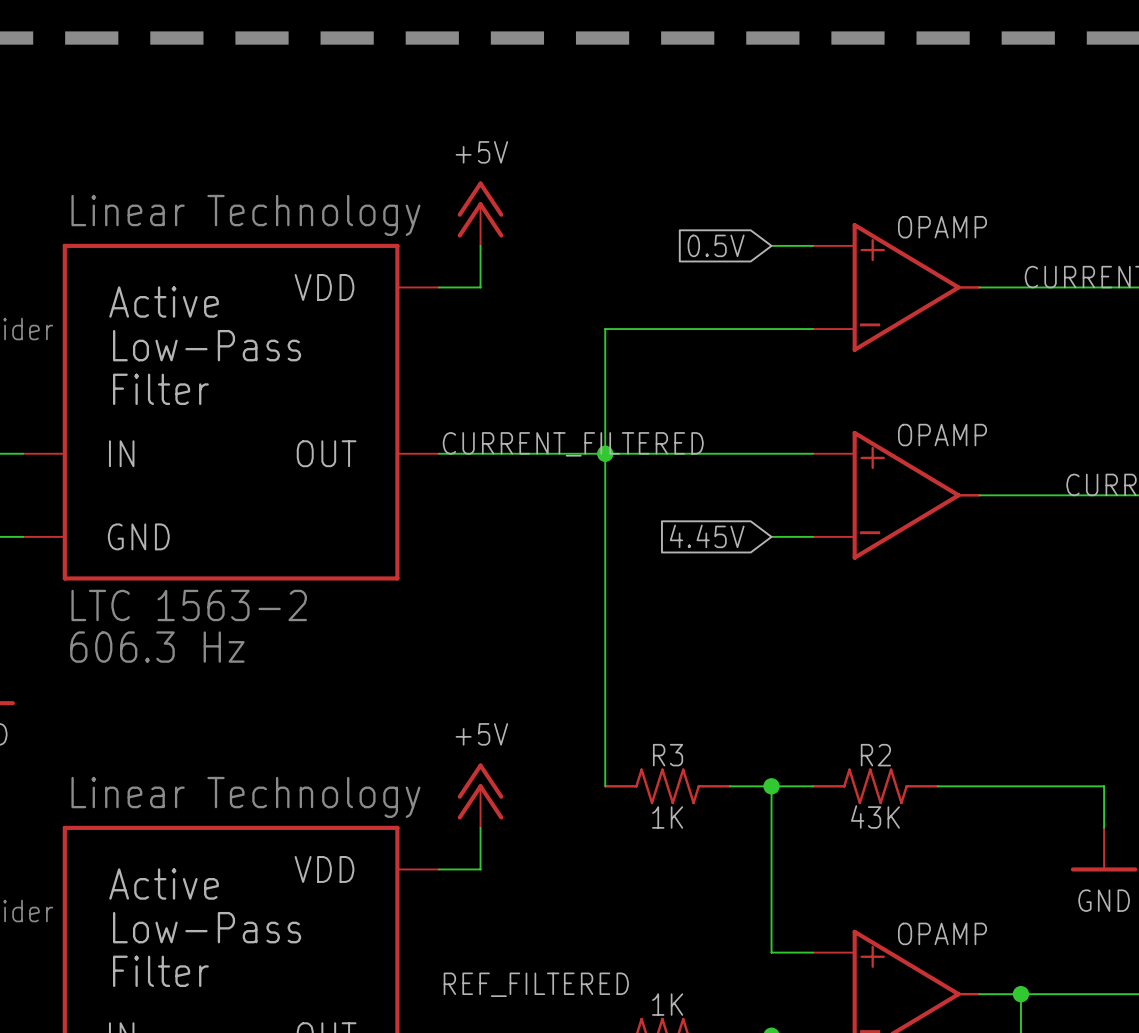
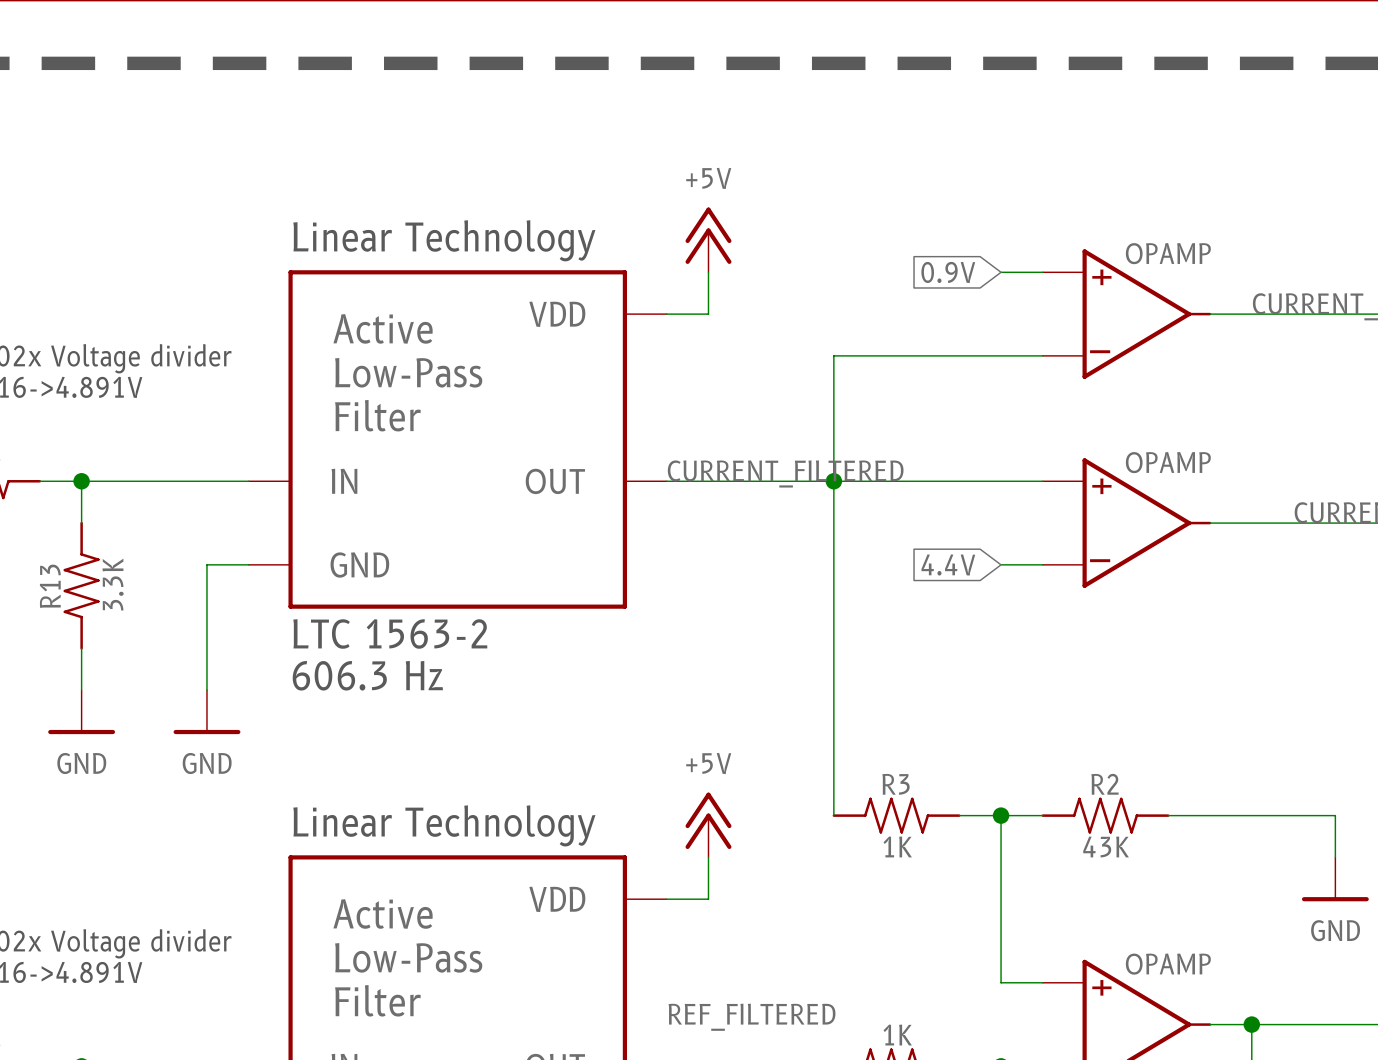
global label: 0.5V (716, 245) -> 0.9V (948, 272)
global label: 4.45V (707, 536) -> 4.4V (948, 564)

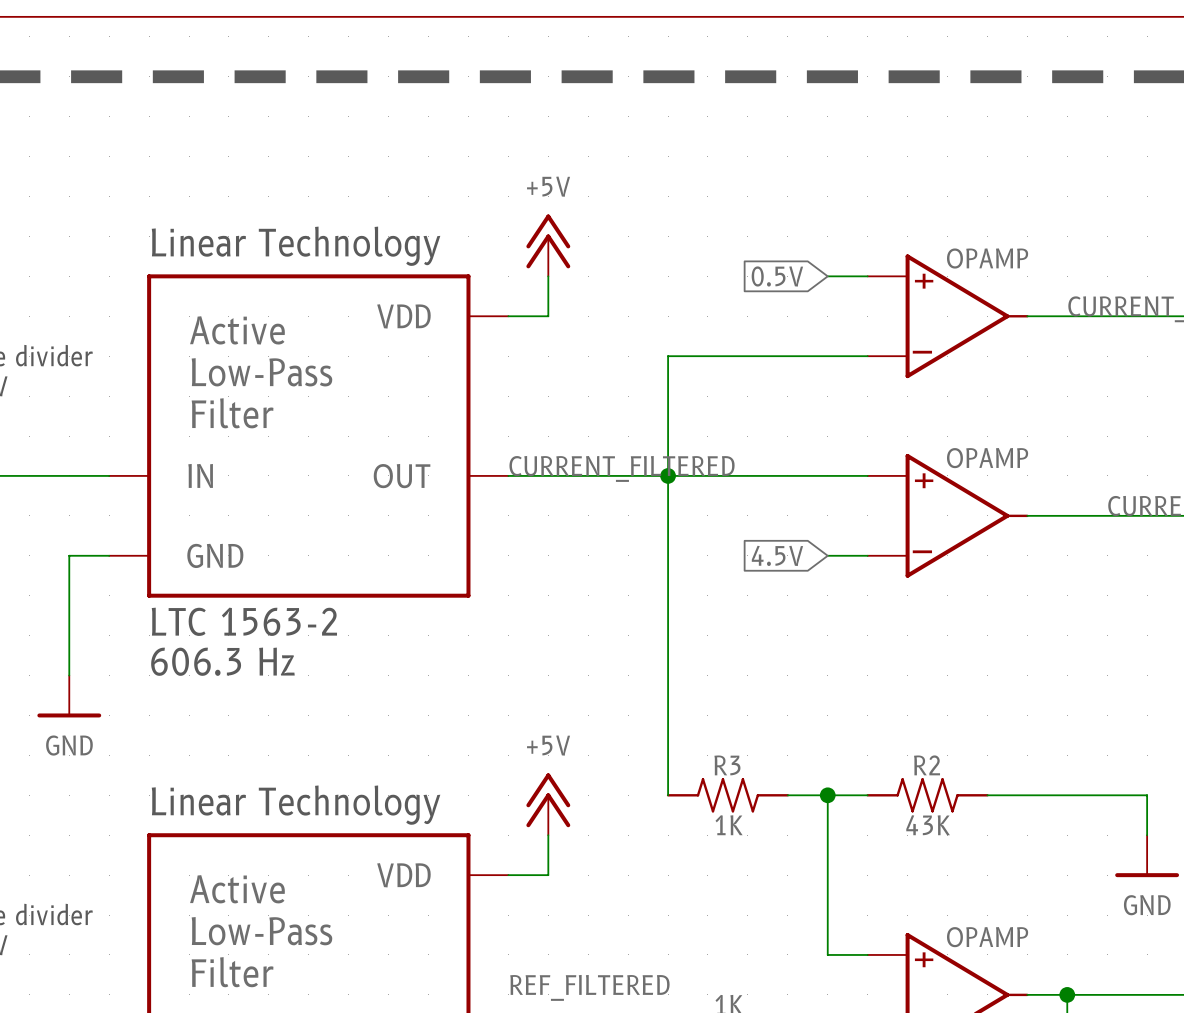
global label: 0.9V (948, 272) -> 0.5V (777, 276)
global label: 4.4V (948, 564) -> 4.5V (777, 555)

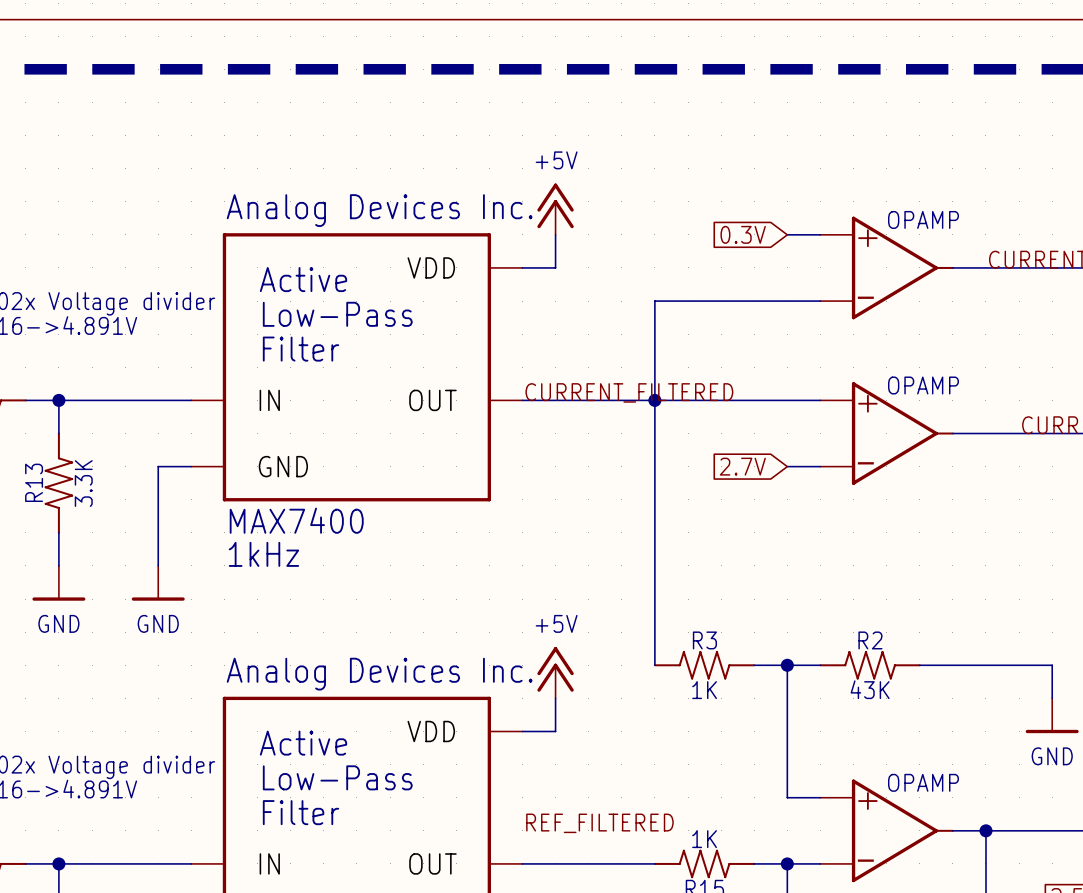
part text: Linear Technology (296, 246) -> Analog Devices Inc. (379, 210)
global label: 0.5V (777, 276) -> 0.3V (743, 234)
global label: 4.5V (777, 555) -> 2.7V (742, 466)
part text: LTC 1563-2 (244, 621) -> MAX7400 (296, 520)
part text: 606.3 Hz (222, 661) -> 1kHz (263, 554)
part text: Linear Technology (296, 805) -> Analog Devices Inc. (379, 674)

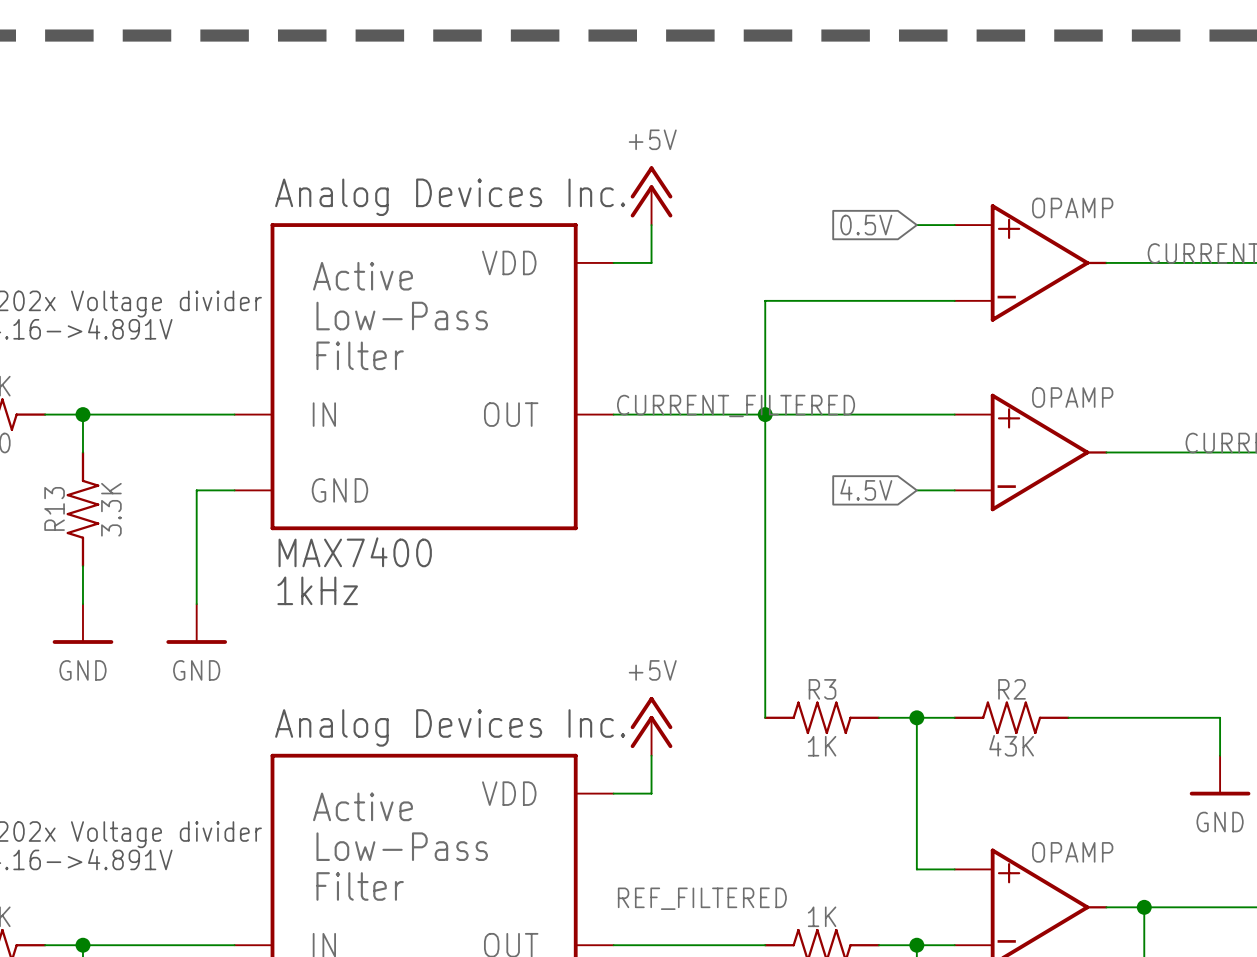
global label: 0.3V (743, 234) -> 0.5V (866, 225)
global label: 2.7V (742, 466) -> 4.5V (866, 489)

